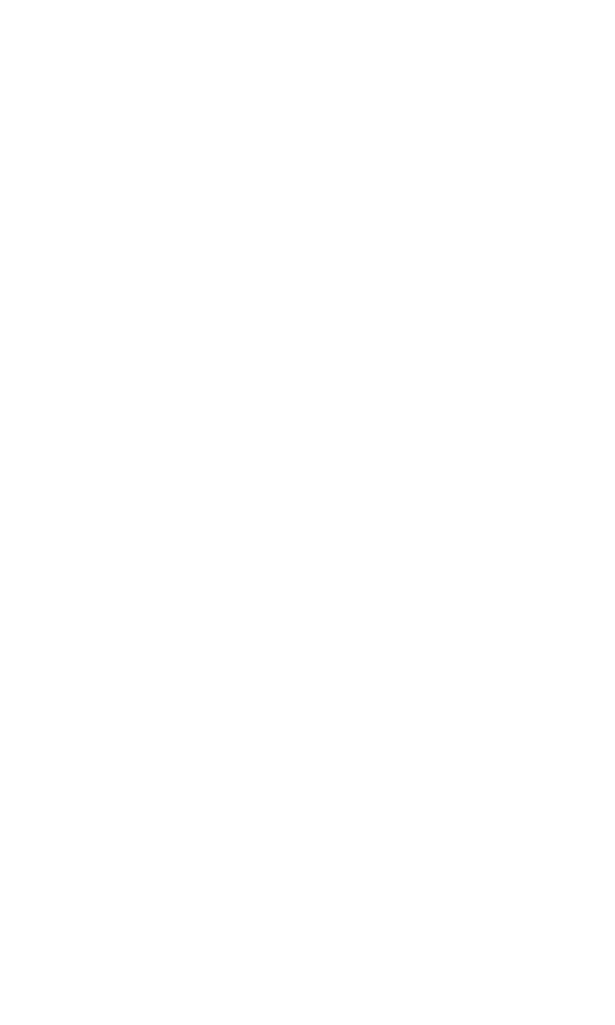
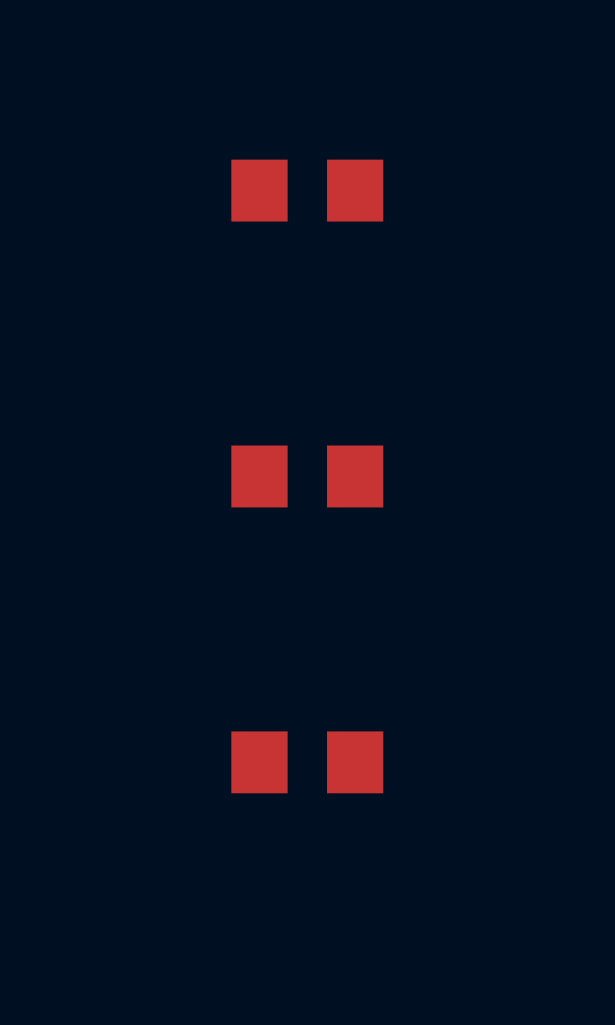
part: none -> (307, 190)
part: none -> (307, 476)
part: none -> (307, 762)

